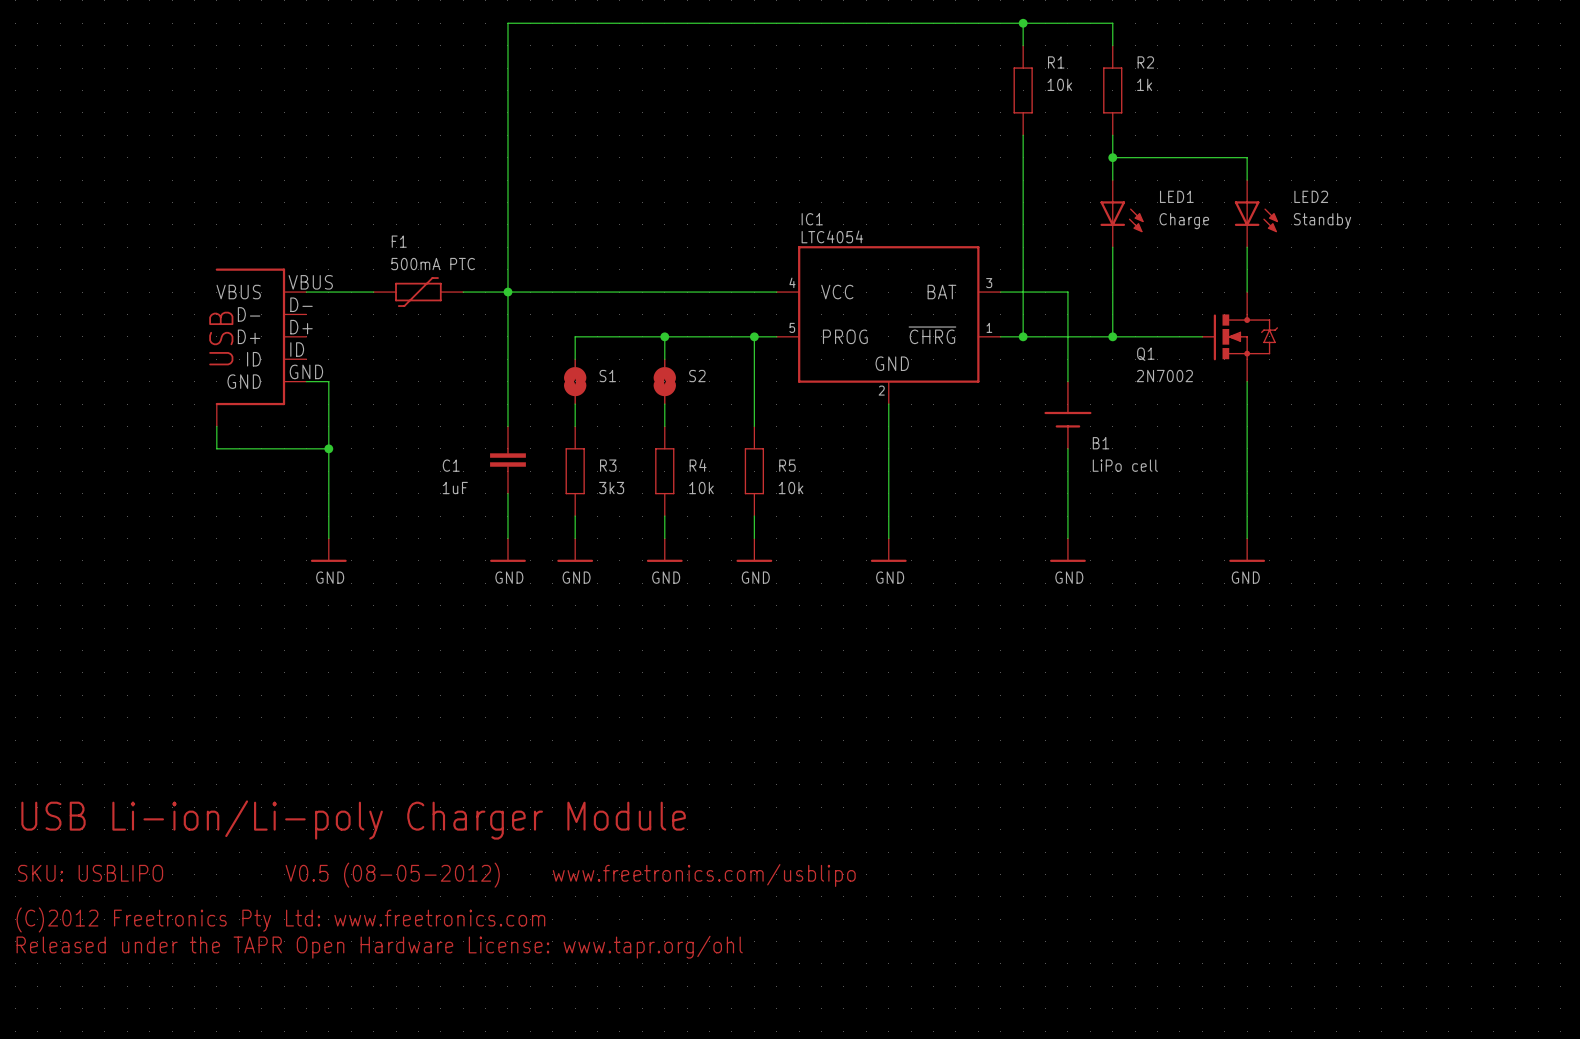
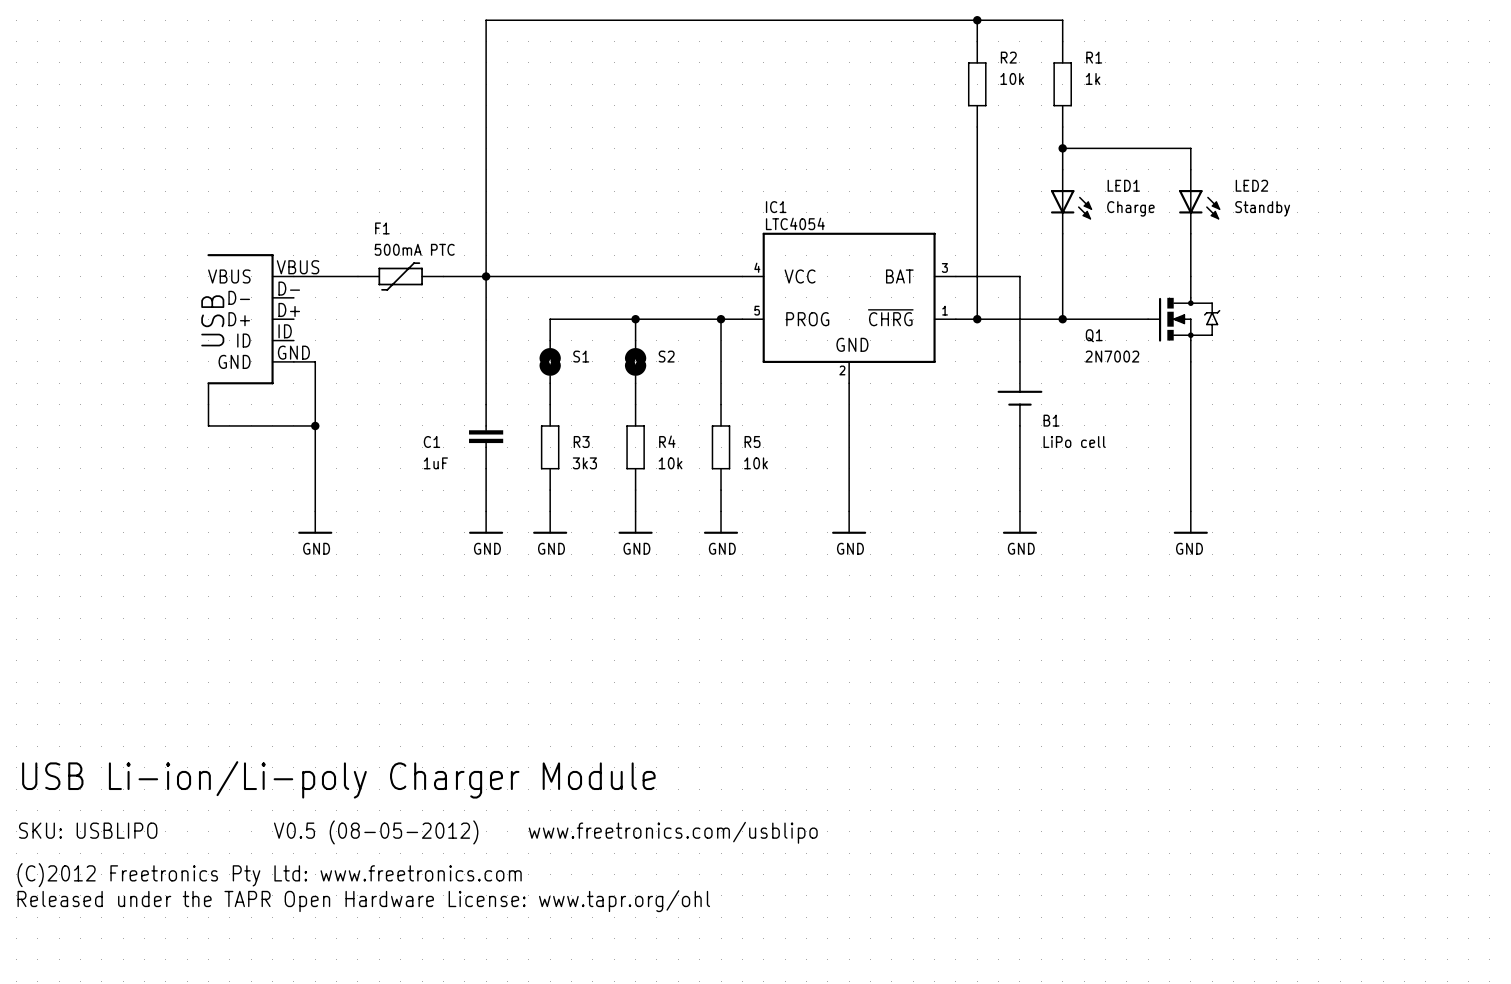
R1 name: R1 (1056, 62) -> R2 (1008, 57)
R2 name: R2 (1145, 62) -> R1 (1094, 57)

